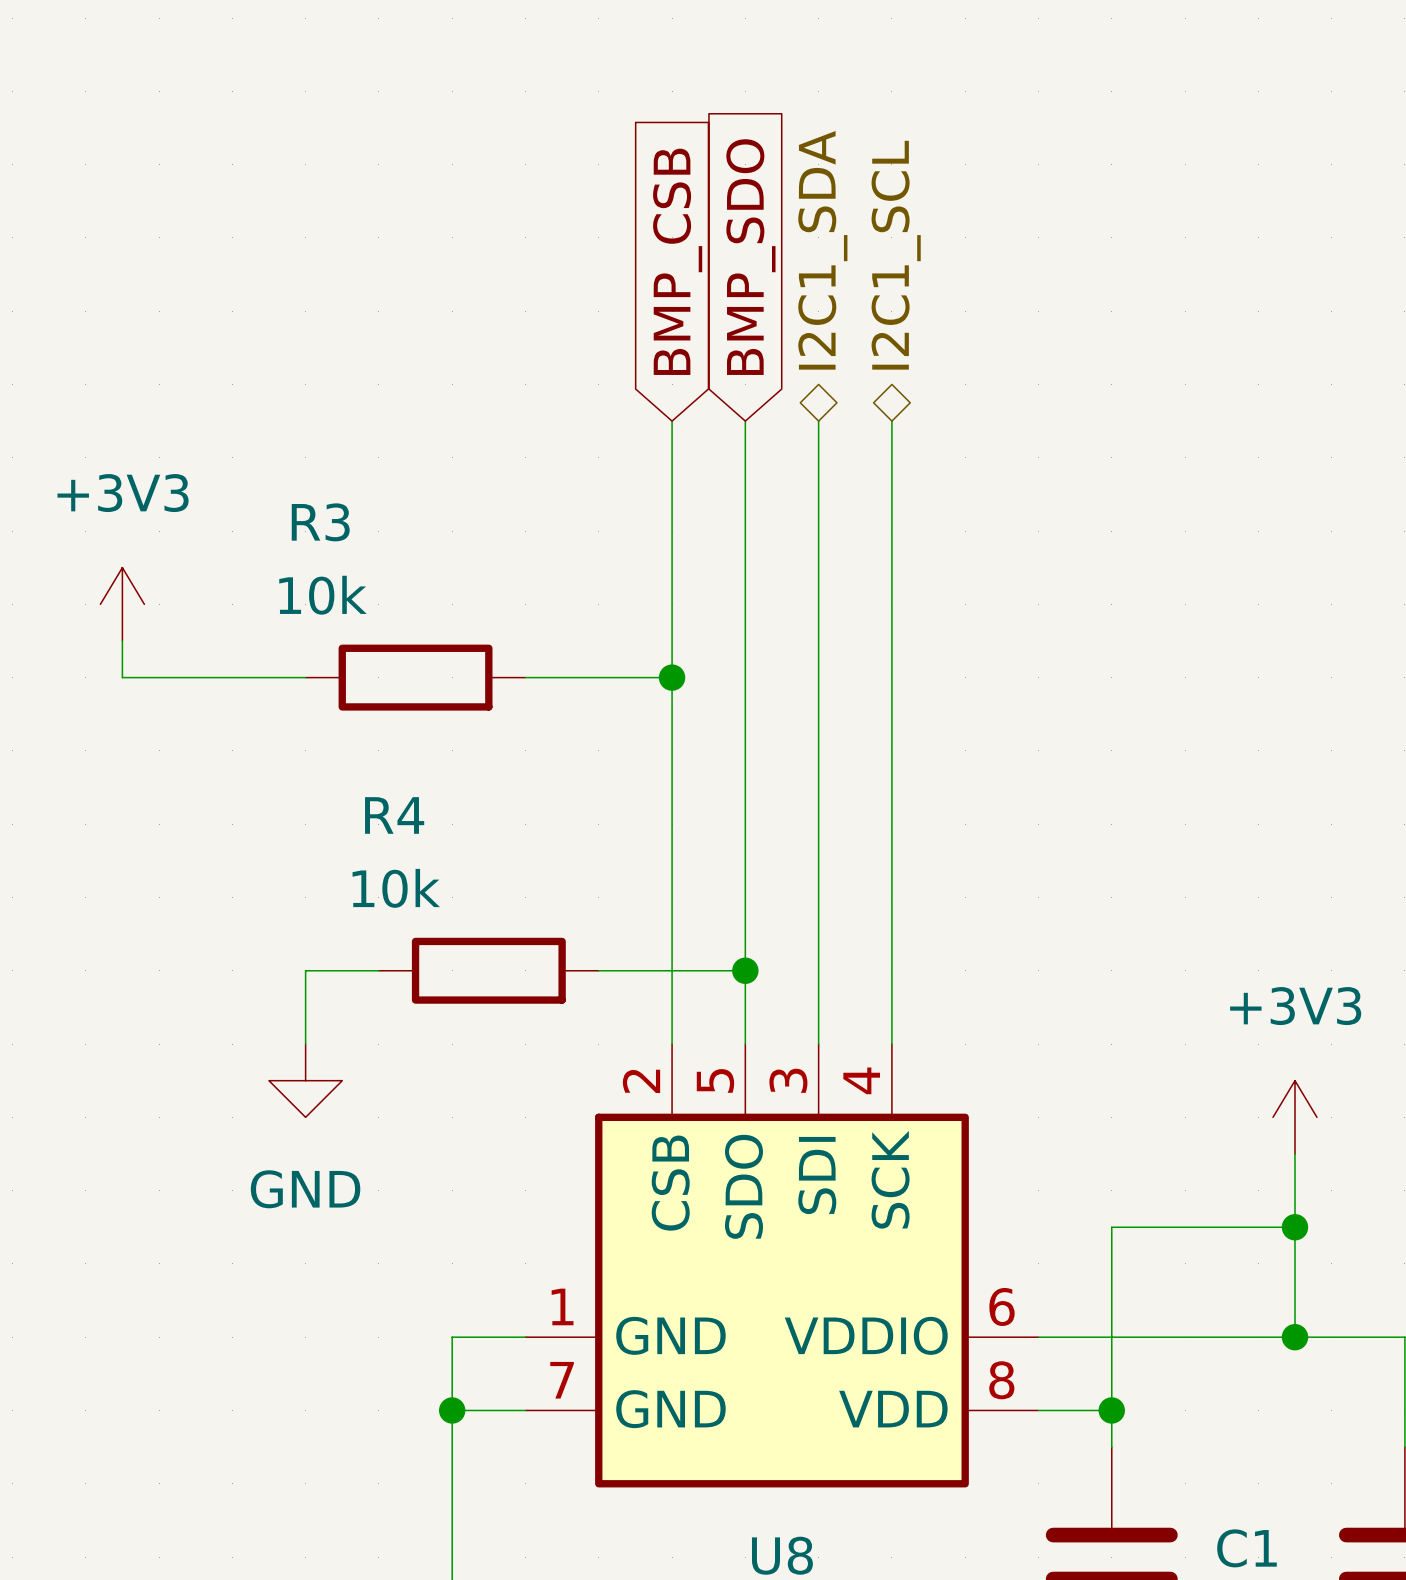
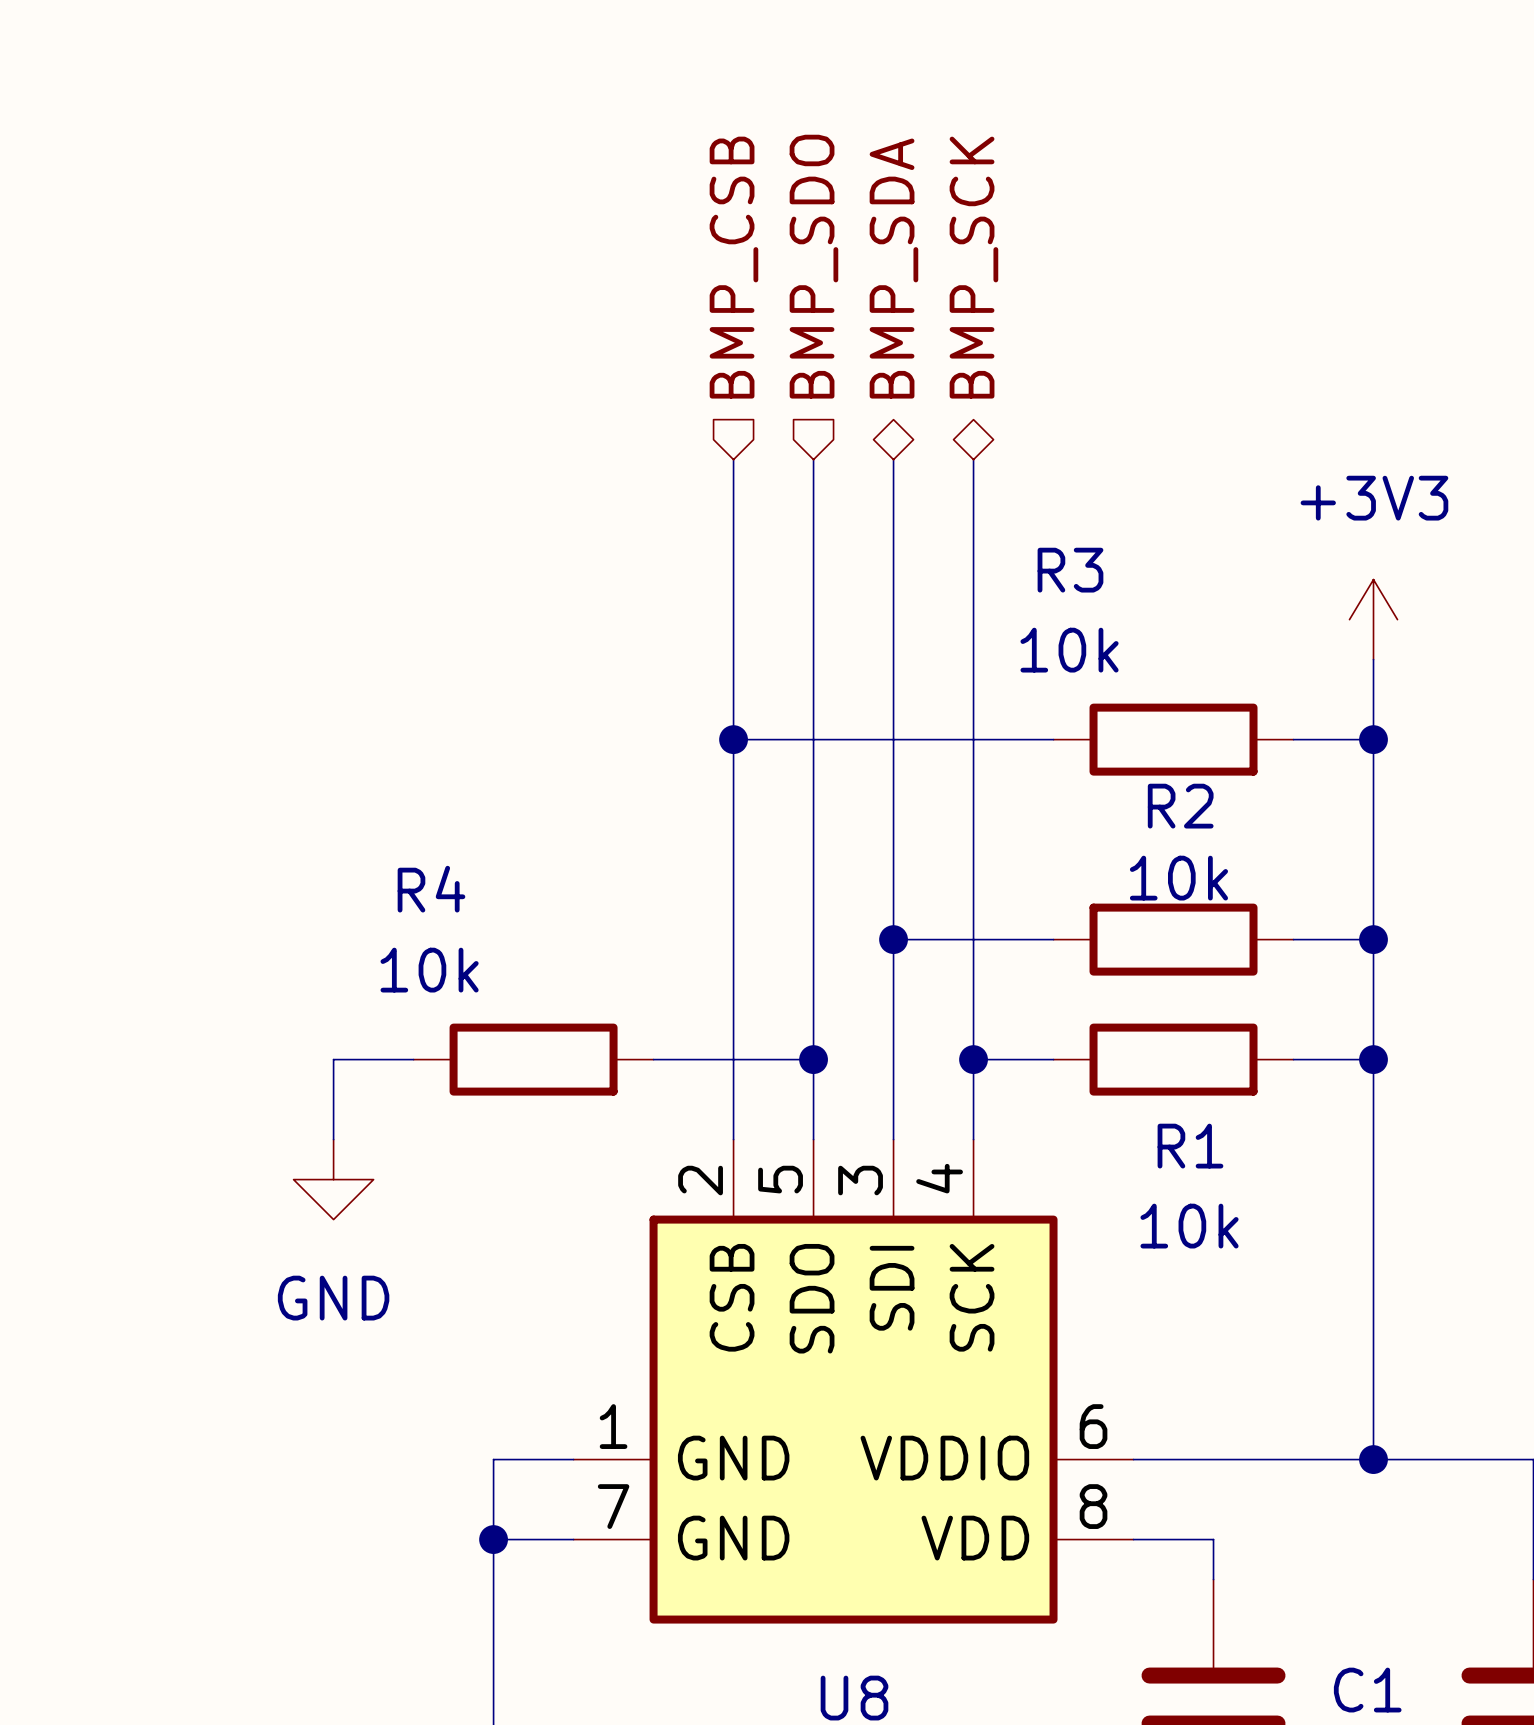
hierarchical label: I2C1_SDA (822, 250) -> BMP_SDA (893, 268)
hierarchical label: none -> BMP_SDO (813, 266)
hierarchical label: I2C1_SCL (896, 255) -> BMP_SCK (973, 267)
hierarchical label: none -> BMP_CSB (733, 267)
global label: BMP_SDO (750, 257) -> none
global label: BMP_CSB (677, 261) -> none
power symbol: +3V3 (122, 604) -> none
wire: none -> (1373, 659) (1373, 1459)
wire: (122, 640) (122, 677) (305, 677) -> none
R3 position: (415, 677) -> (1173, 739)
wire: (525, 677) (672, 677) -> (1053, 739) (733, 739)
wire: none -> (1293, 739) (1373, 739)
junction: none -> (1373, 739)
wire: none -> (893, 939) (1053, 939)
junction: none -> (893, 939)
R2: none -> 10k (1173, 939)
wire: none -> (1293, 939) (1373, 939)
junction: none -> (1373, 939)
wire: none -> (973, 1059) (1053, 1059)
junction: none -> (973, 1059)
R1: none -> 10k (1173, 1059)
wire: none -> (1293, 1059) (1373, 1059)
junction: none -> (1373, 1059)
power symbol position: +3V3 (1294, 1117) -> +3V3 (1373, 619)
wire: (1294, 1153) (1294, 1337) -> none
wire: (1294, 1227) (1111, 1227) (1111, 1410) -> none
junction: (1294, 1227) -> none
junction position: (1294, 1337) -> (1373, 1459)
junction: (1111, 1410) -> none

